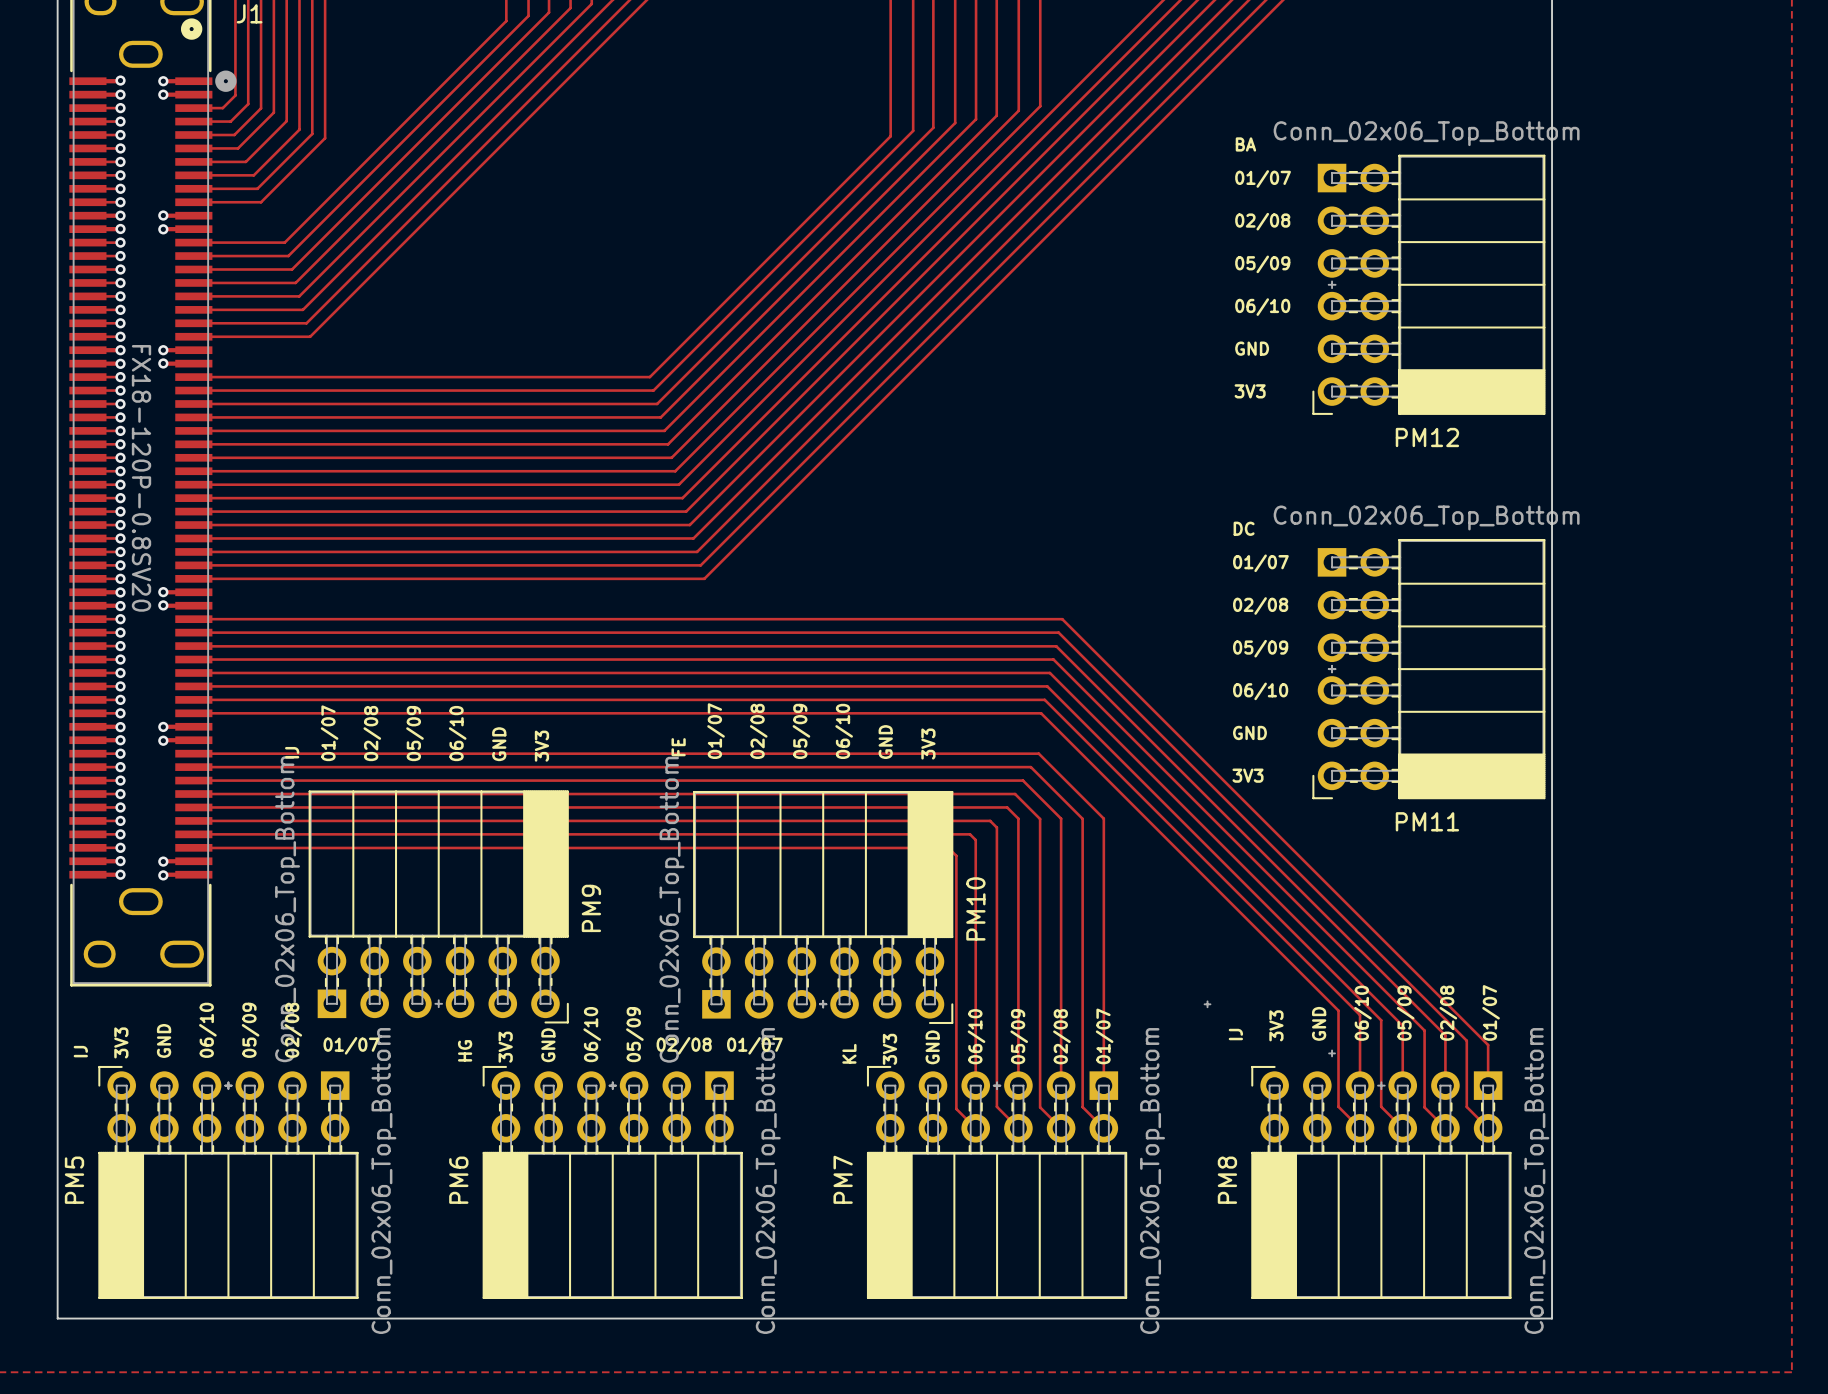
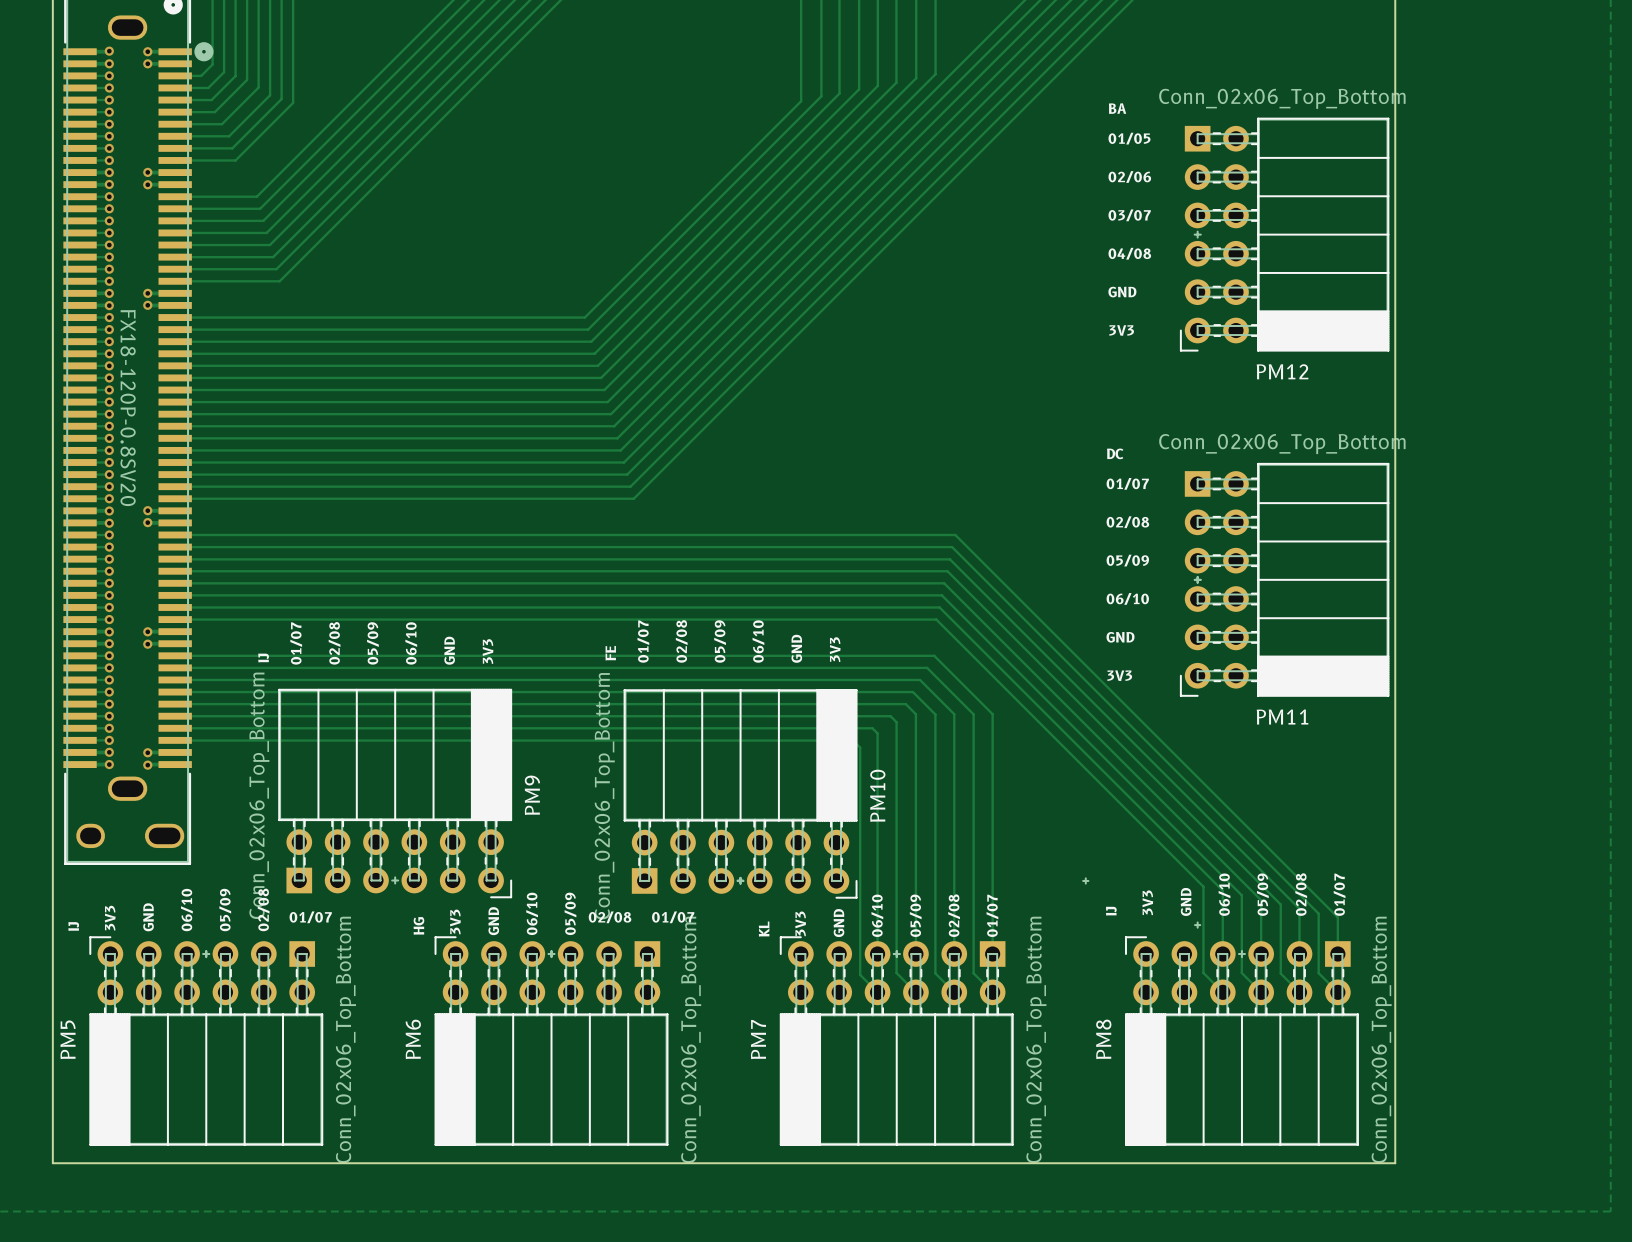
text: 01/07 (1263, 178) -> 01/05 (1129, 138)
text: 02/08 (1262, 221) -> 02/06 (1129, 176)
text: 05/09 (1262, 264) -> 03/07 (1129, 215)
text: 06/10 (1262, 307) -> 04/08 (1129, 253)

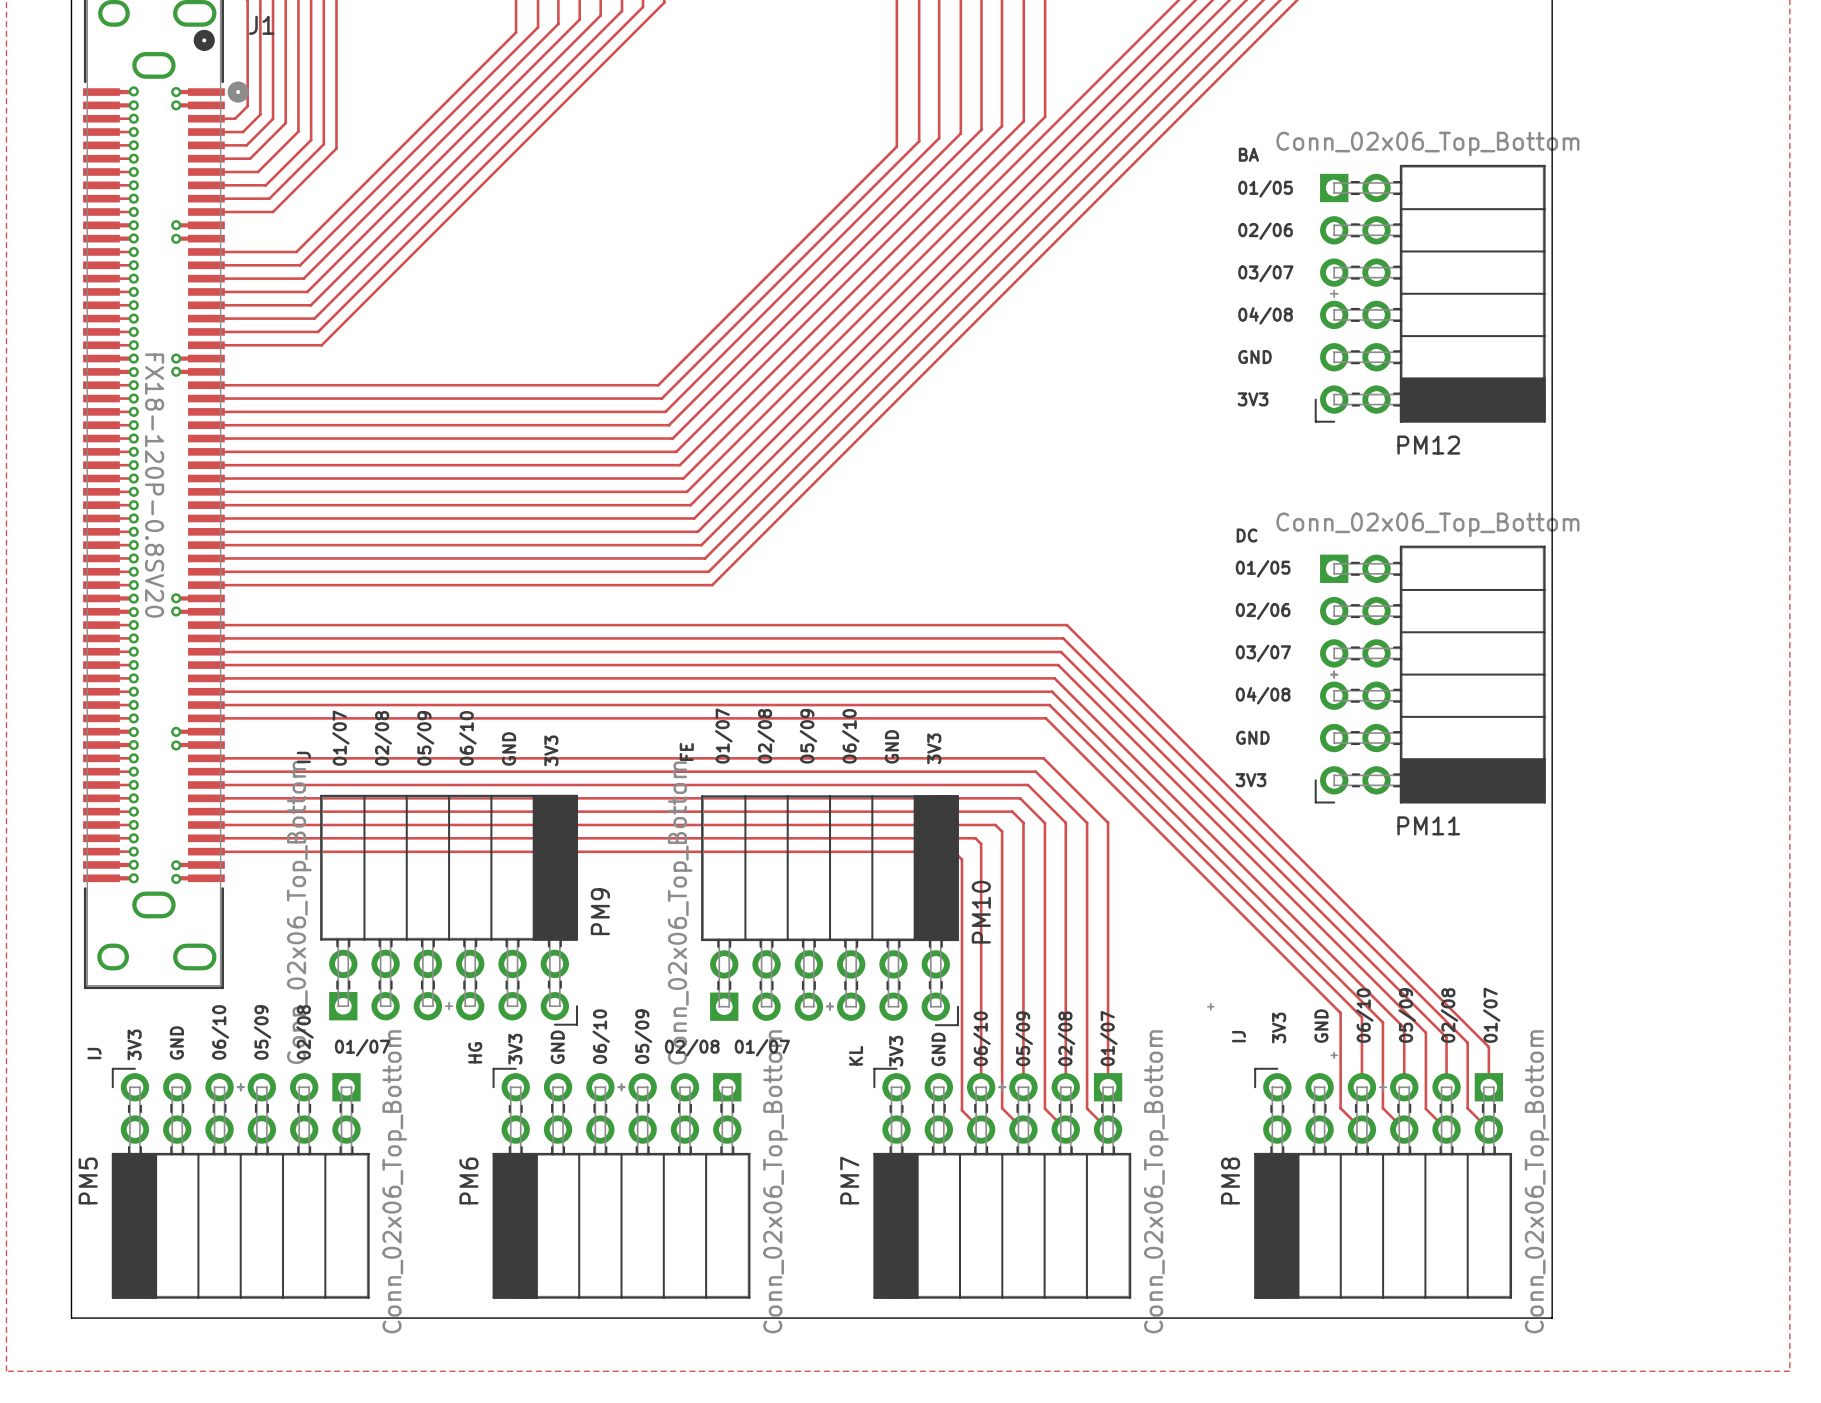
text: 01/07 (1127, 483) -> 01/05 (1263, 568)
text: 02/08 (1127, 522) -> 02/06 (1263, 611)
text: 05/09 (1127, 560) -> 03/07 (1263, 653)
text: 06/10 (1127, 598) -> 04/08 (1263, 695)

